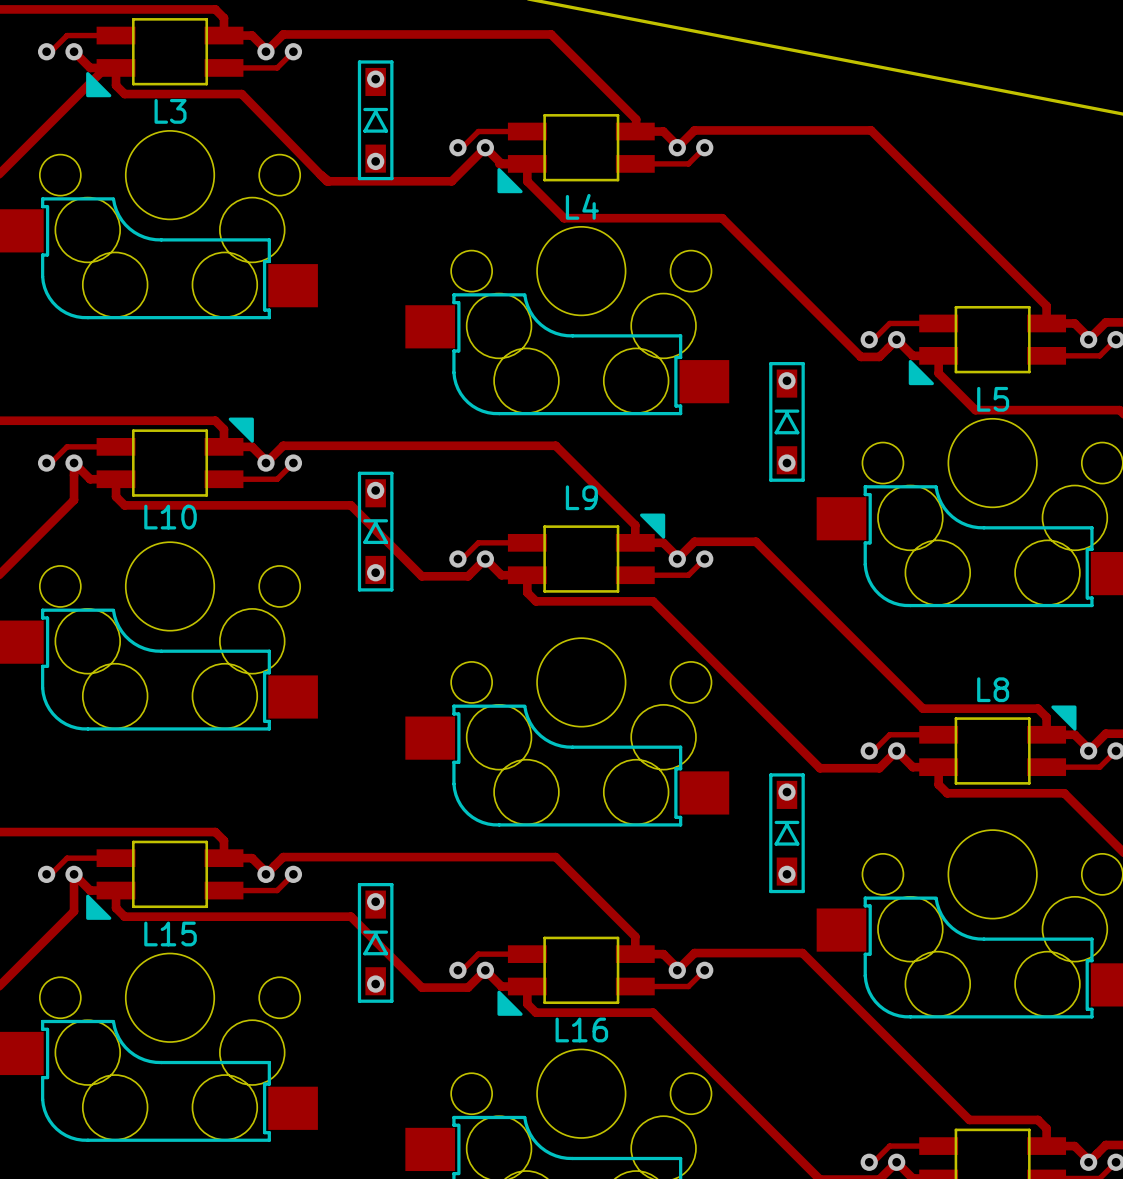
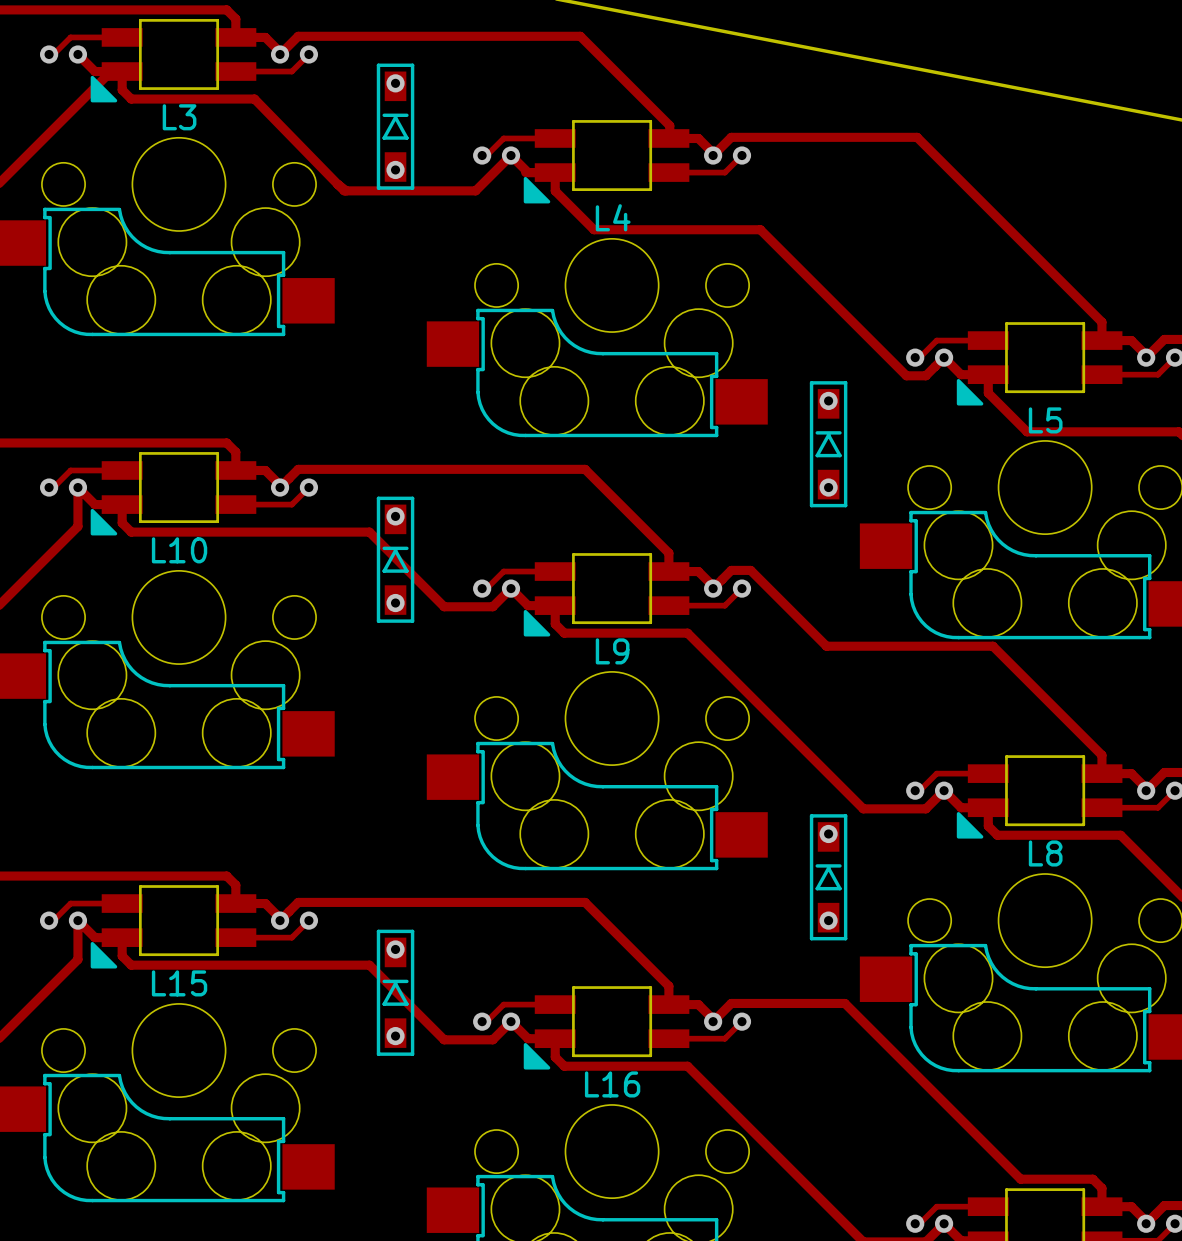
L10 rotation: 0° (175, 457) -> 180° (173, 493)
track: (713, 541) (755, 541) (922, 708) (1037, 708) -> (750, 570) (826, 646) (992, 646) (1092, 746)
L9 rotation: 0° (586, 553) -> 180° (606, 594)
L8 rotation: 0° (997, 745) -> 180° (1039, 796)

